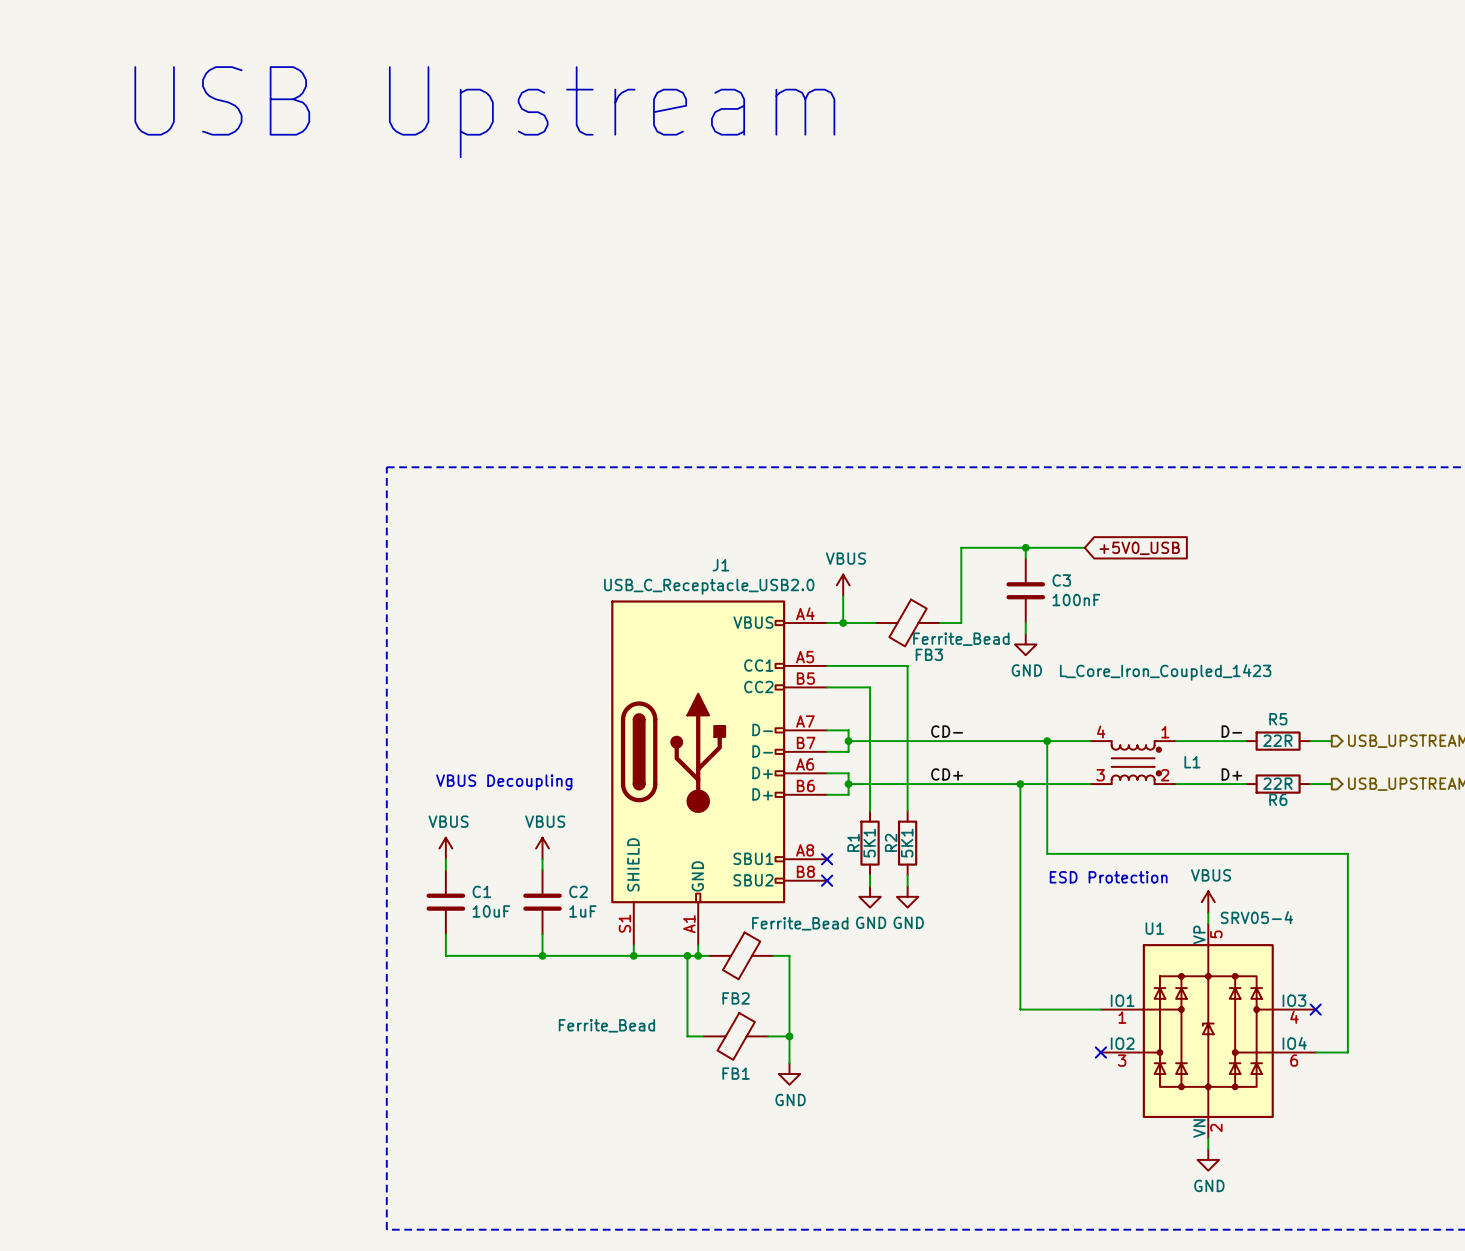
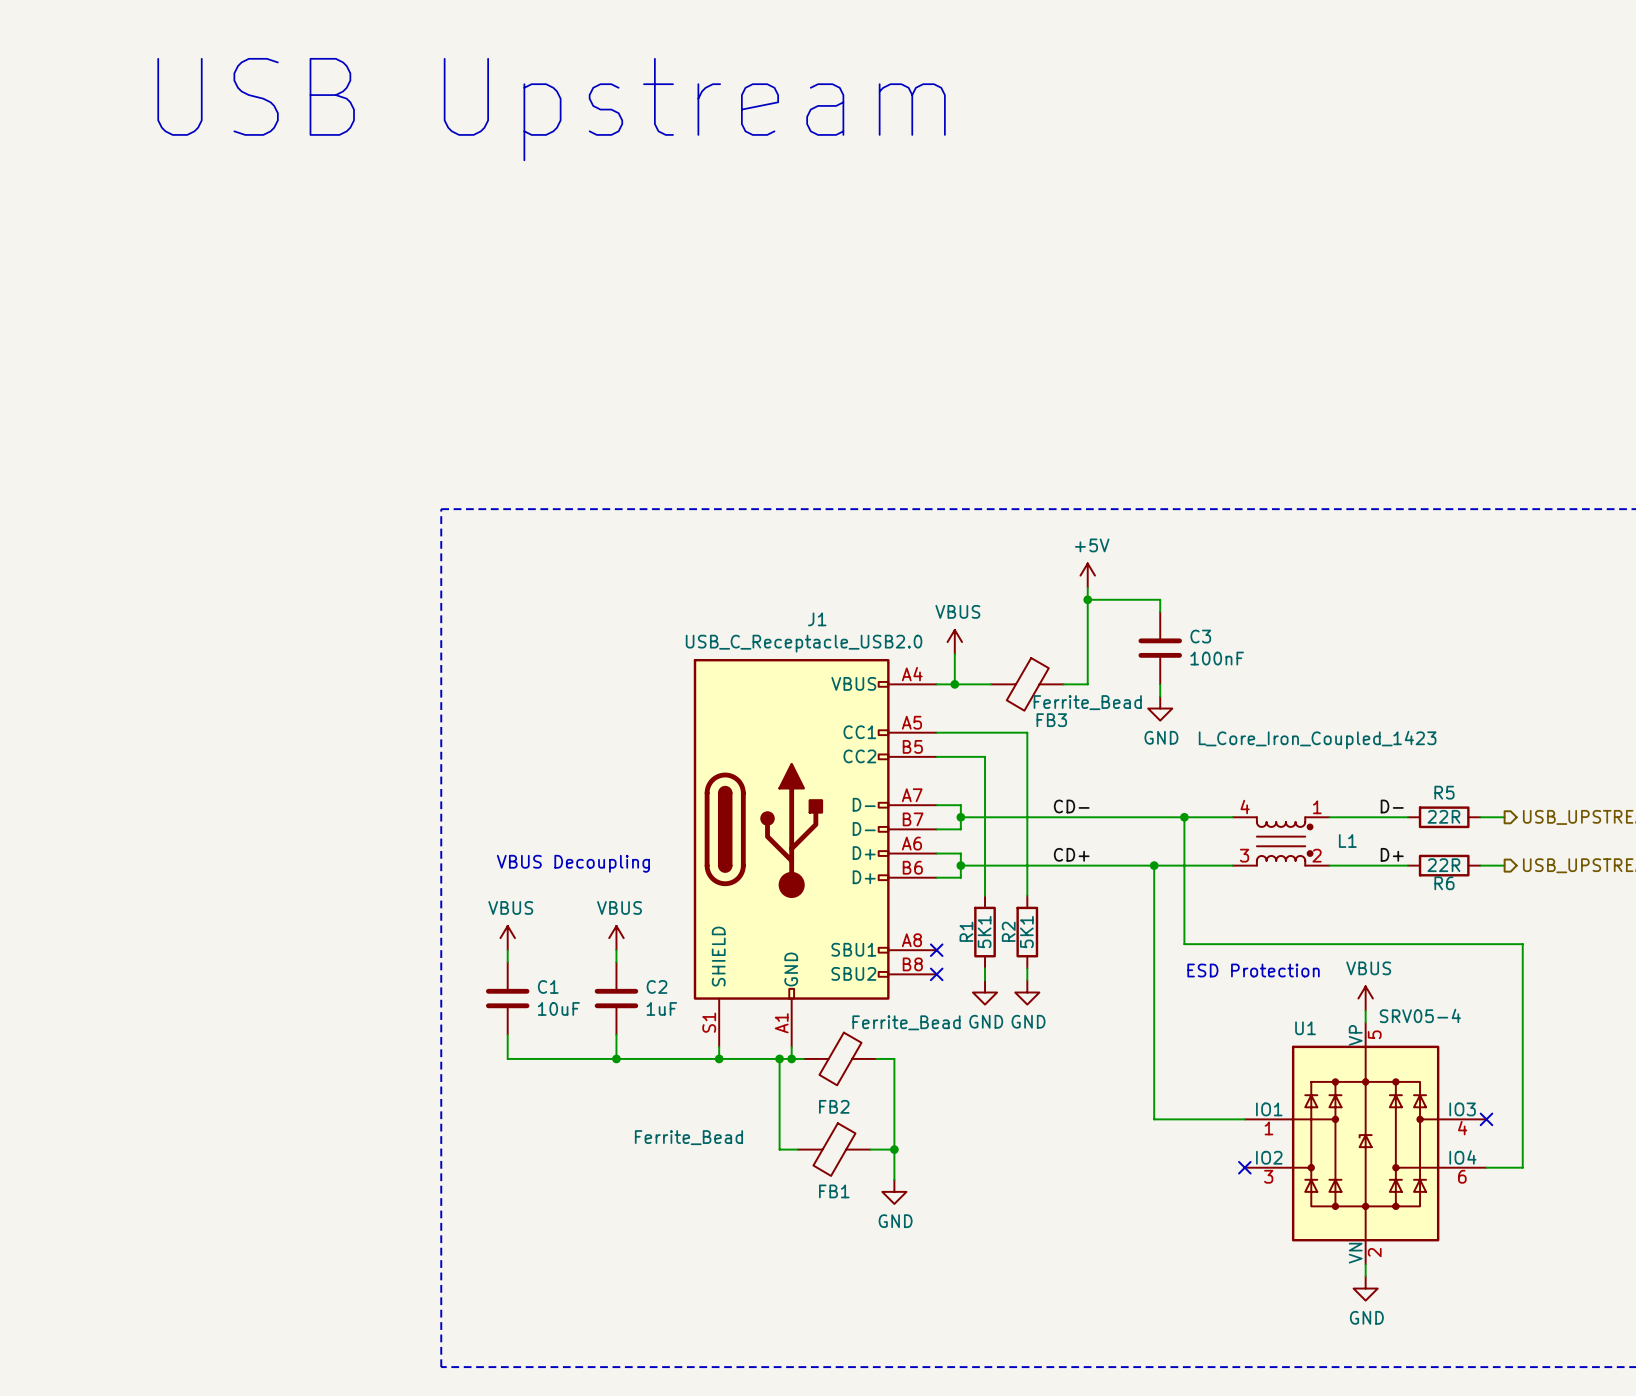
power symbol: none -> +5V (1087, 575)
wire: none -> (1087, 587) (1087, 599)
junction: none -> (1087, 599)
wire: (1025, 547) (1084, 547) -> none
junction: (1025, 547) -> none
global label: +5V0_USB (1139, 548) -> none

